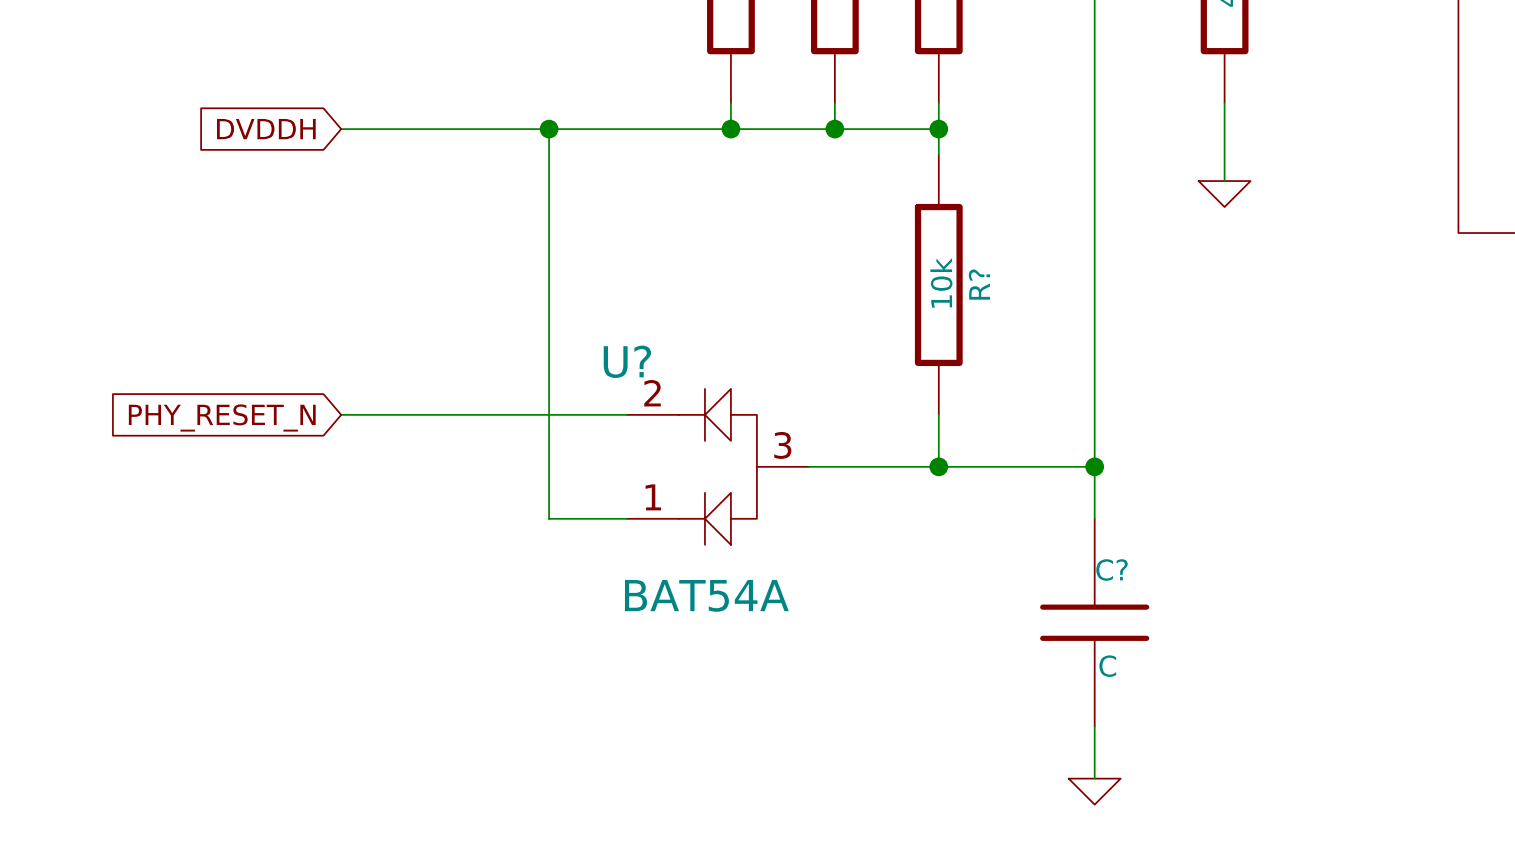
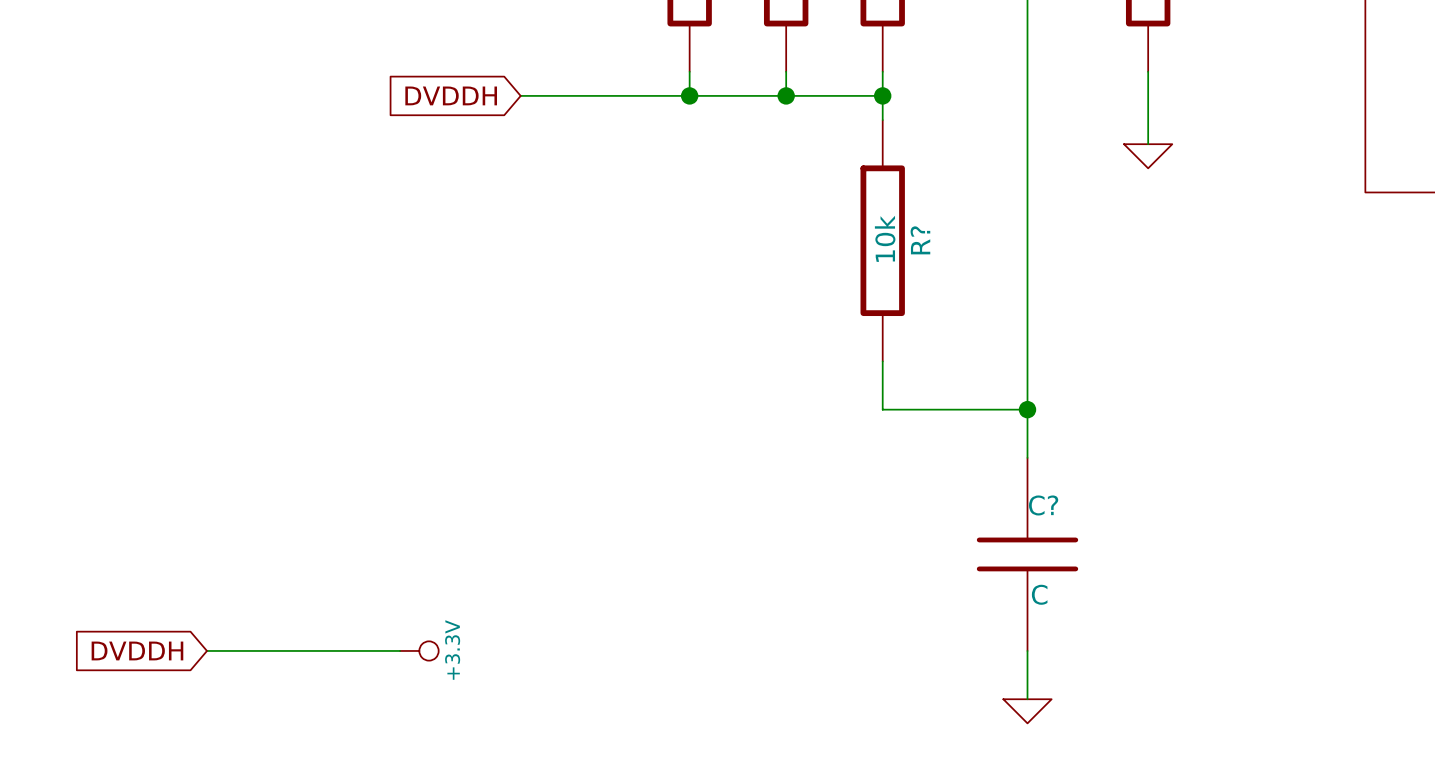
global label position: DVDDH (266, 129) -> DVDDH (451, 95)
wire: (341, 129) (549, 129) (549, 518) (627, 518) -> none
junction: (549, 129) -> none
wire: (341, 414) (627, 414) -> none
global label: PHY_RESET_N (222, 417) -> none
U?: BAT54A (717, 466) -> none
wire: (808, 466) (938, 466) -> none
junction: (938, 466) -> none
global label: none -> DVDDH (137, 650)
wire: none -> (206, 650) (400, 650)
power symbol: none -> +3.3V (419, 650)

